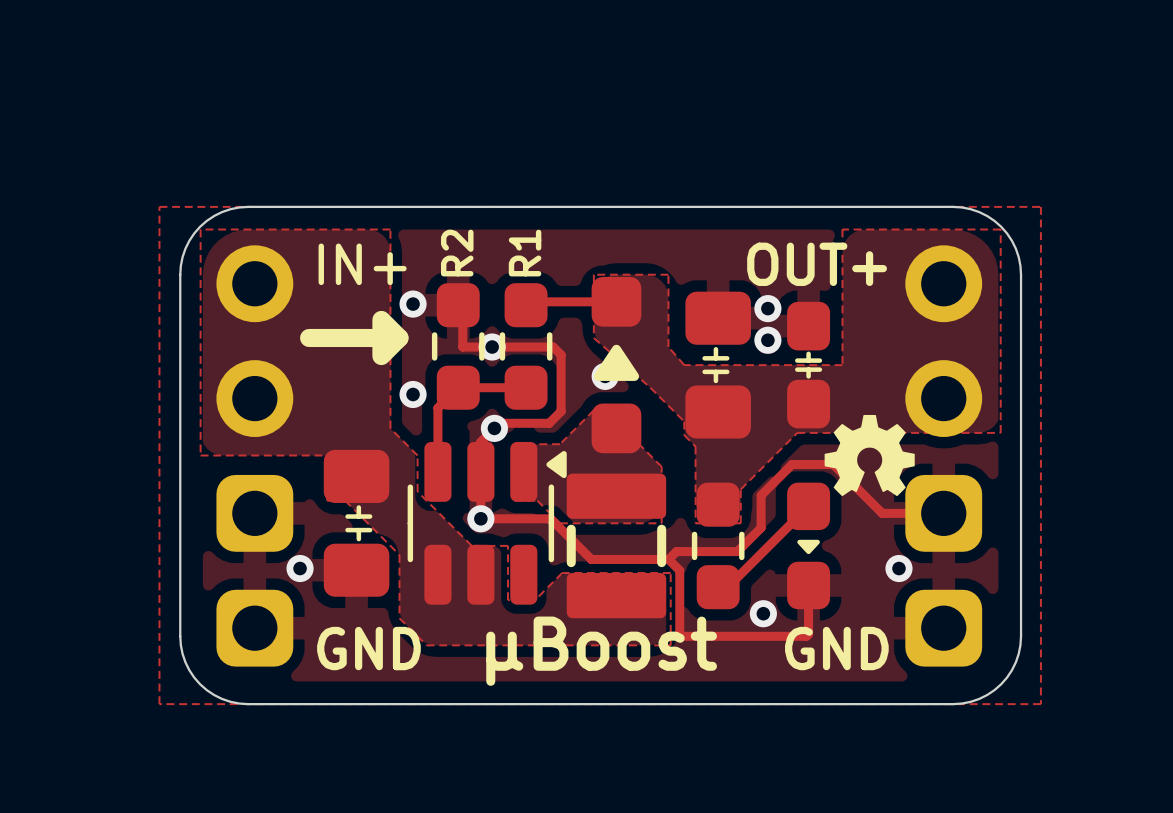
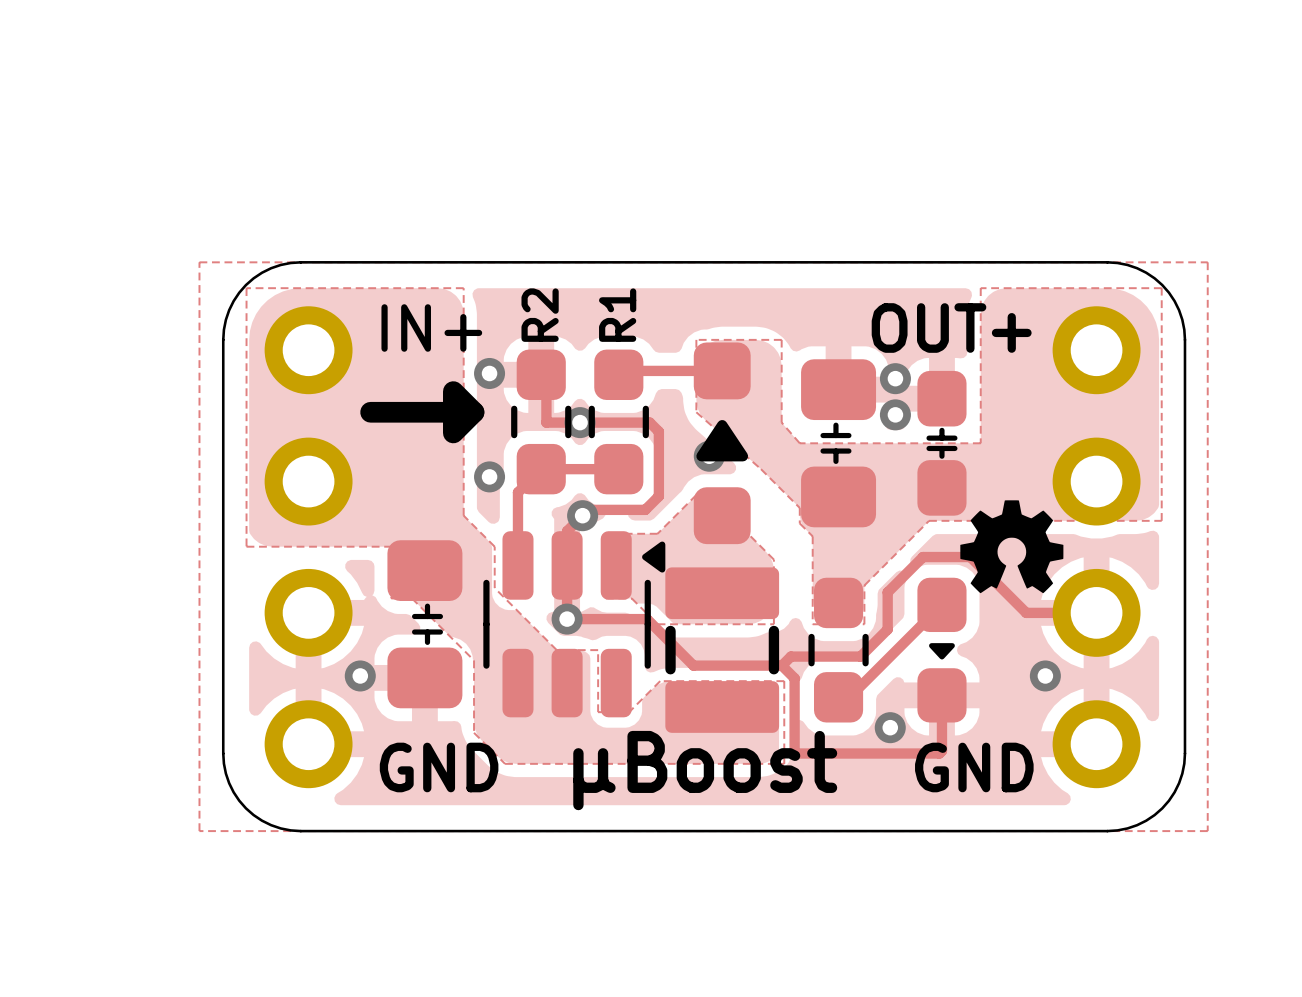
part footprint: [216, 245, 294, 667] -> [264, 306, 353, 789]
part footprint: [905, 245, 983, 667] -> [1052, 306, 1141, 789]

